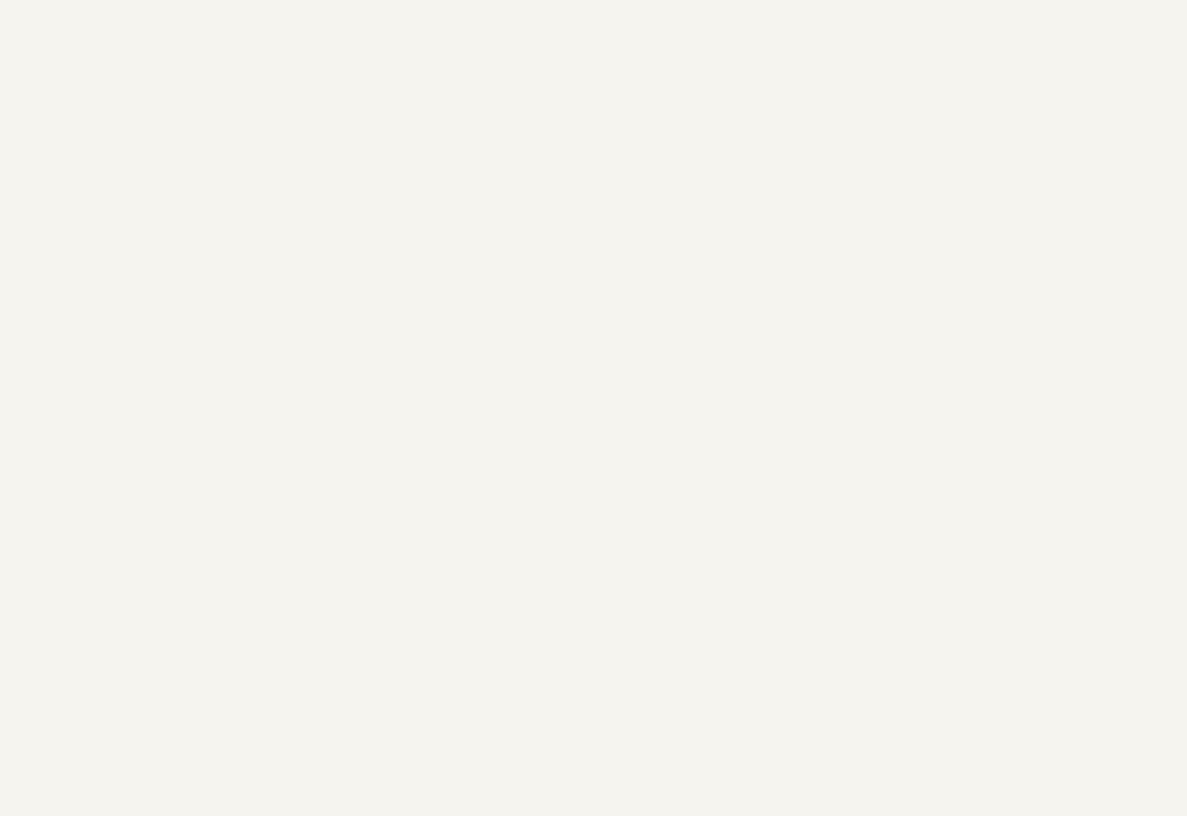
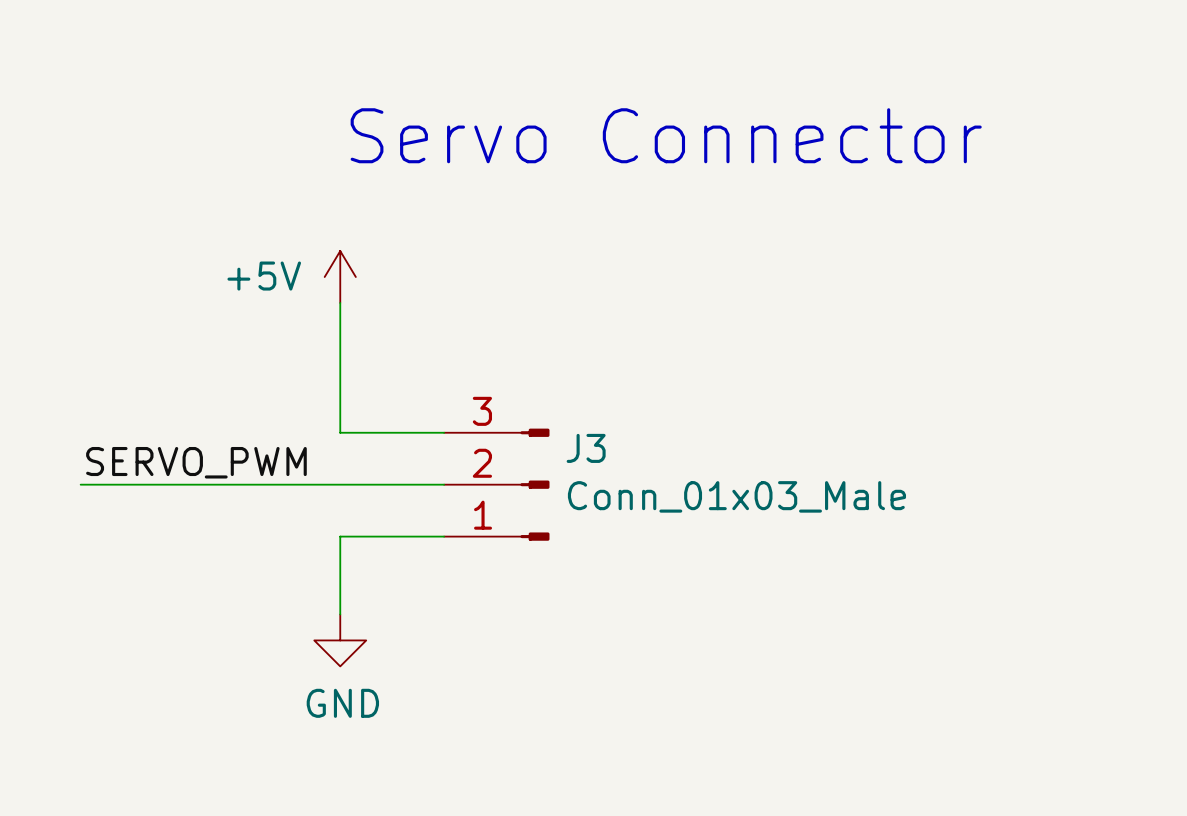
text: none -> Servo Connector (666, 135)
power symbol: none -> +5V (340, 277)
wire: none -> (340, 302) (340, 432) (444, 432)
label: none -> SERVO_PWM (196, 462)
wire: none -> (80, 484) (444, 484)
J3: none -> Conn_01x03_Male (496, 484)
wire: none -> (444, 536) (340, 536) (340, 614)
power symbol: none -> GND (340, 640)

